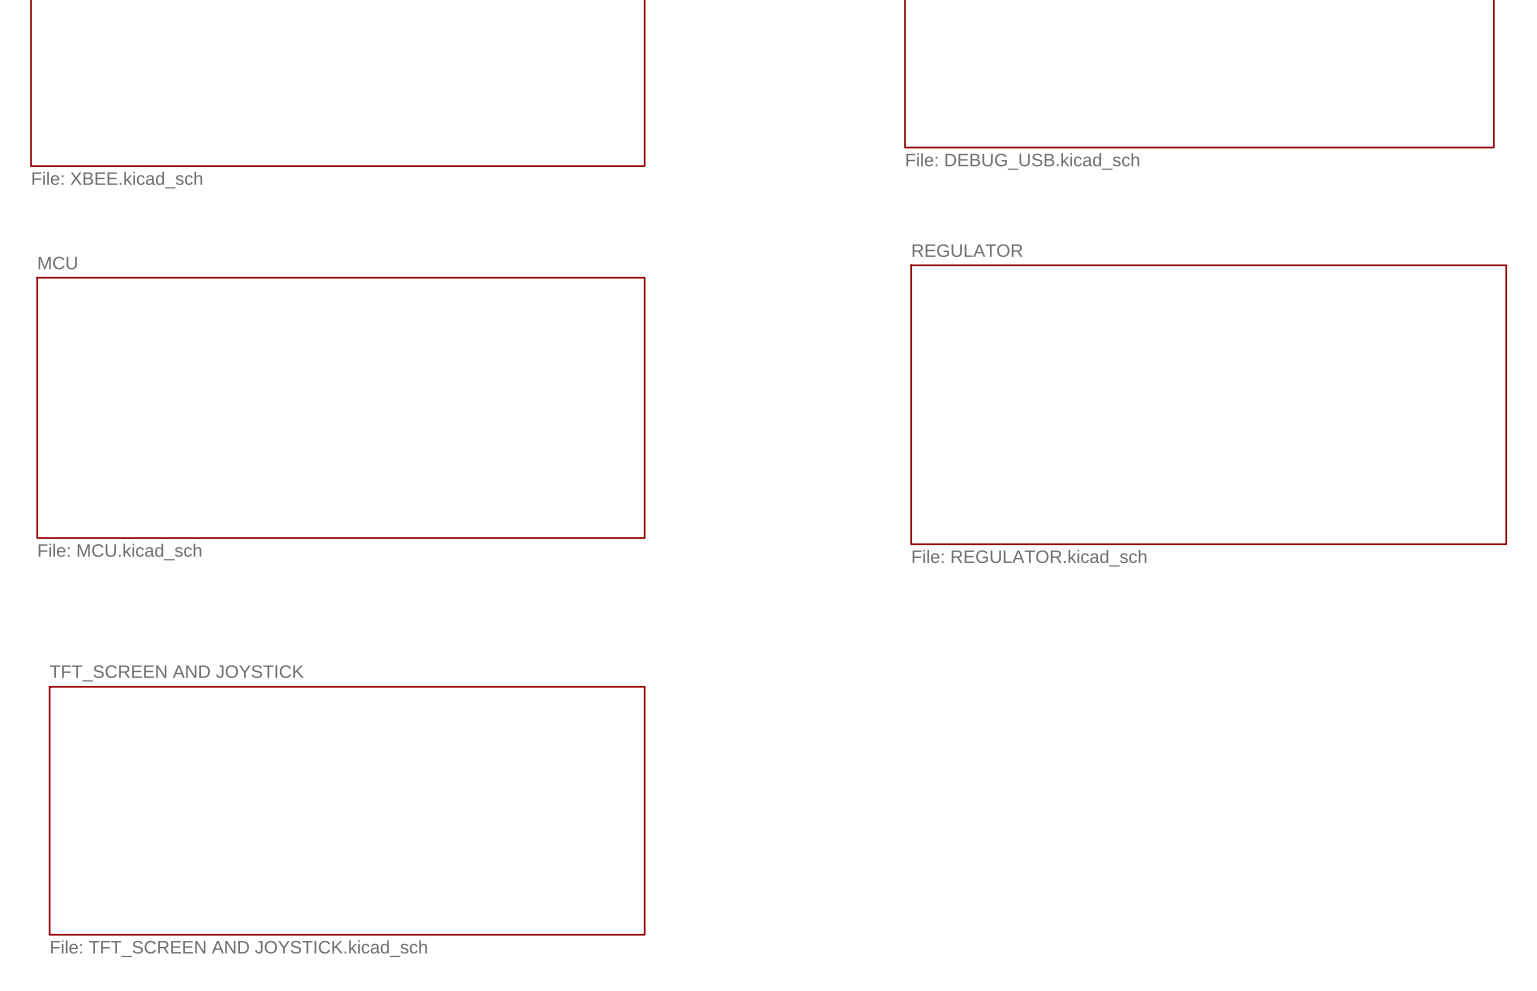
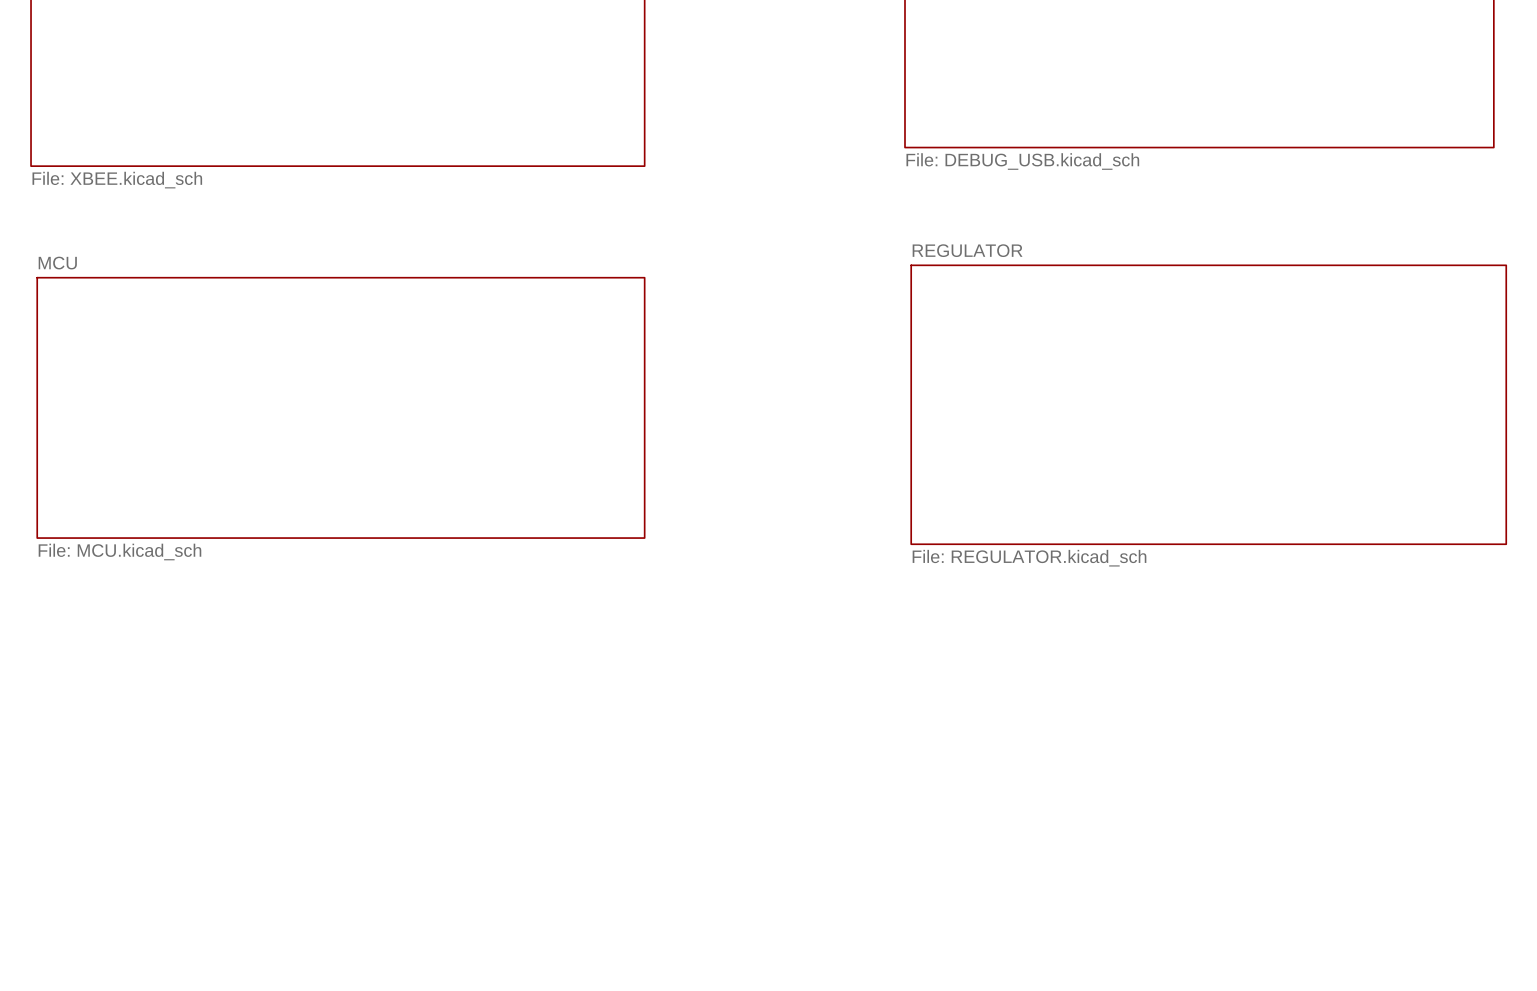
sheet TFT_SCREEN AND JOYSTICK: File: TFT_SCREEN AND JOYSTICK.kicad_sch (347, 810) -> none

